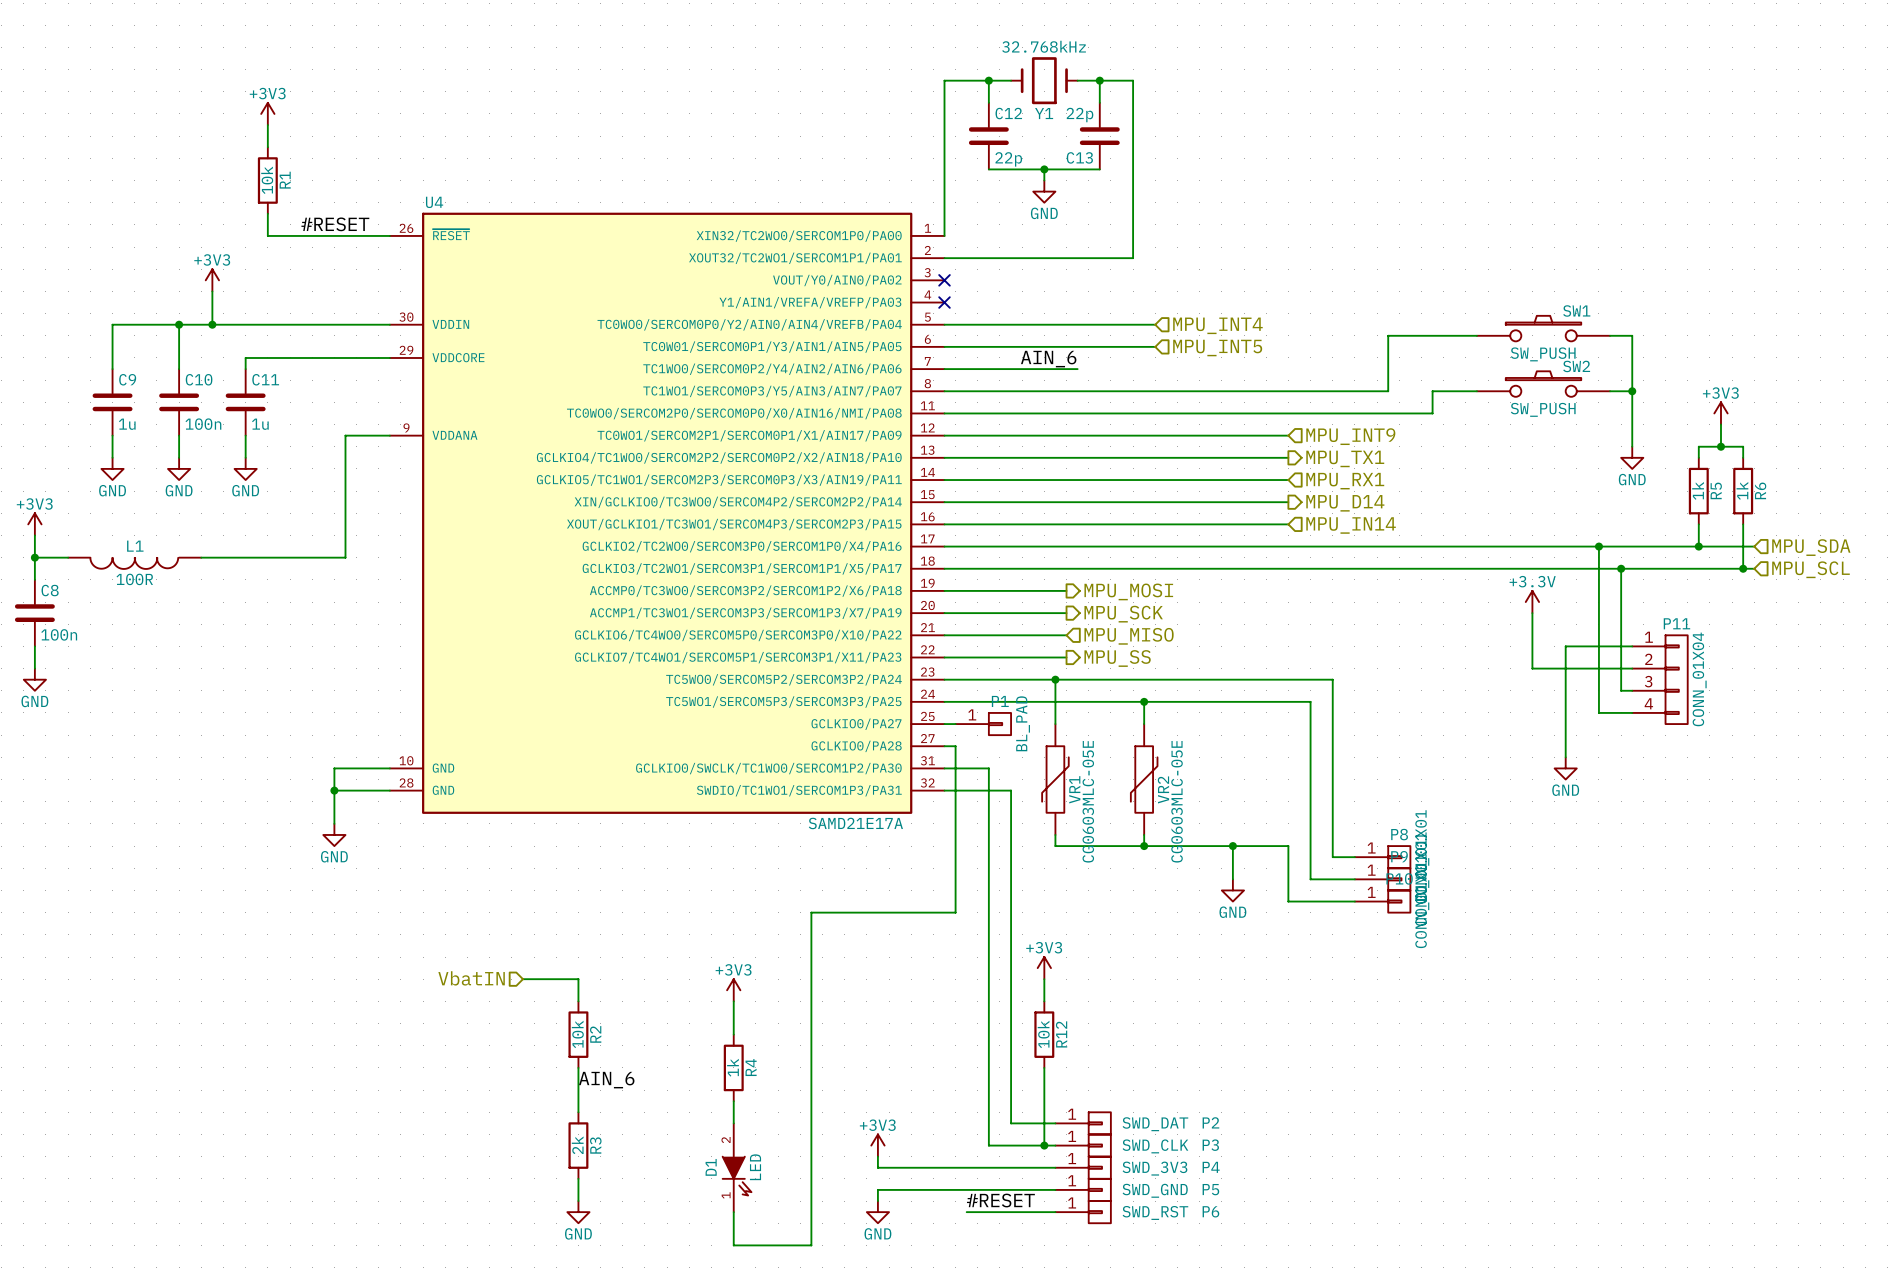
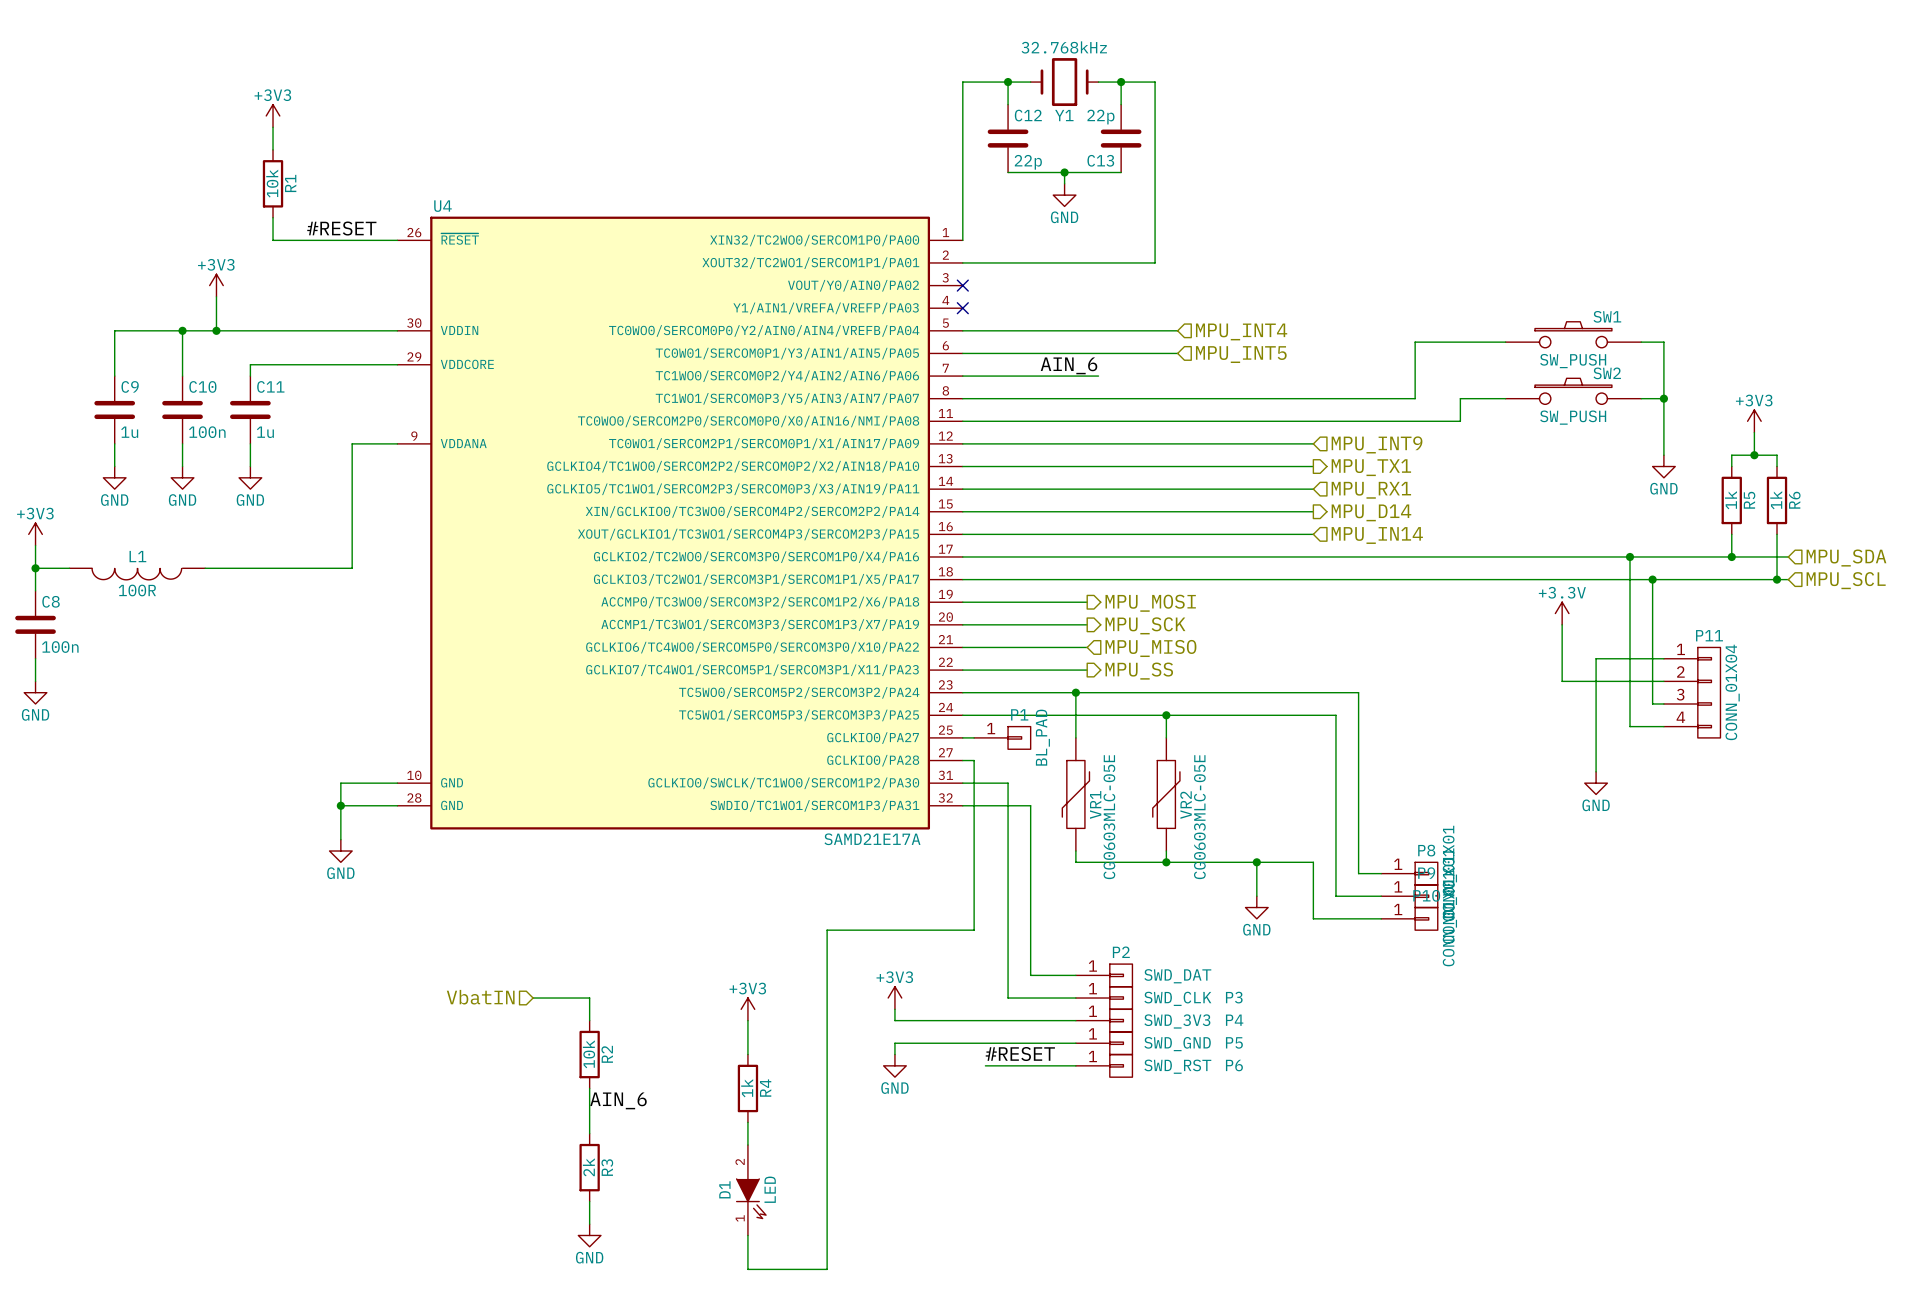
wire: (1011, 957) (1011, 1123) (1055, 1123) -> (1030, 975) (1075, 975)
power symbol: +3V3 (1044, 968) -> none
power symbol: none -> +3V3 (894, 998)
wire: (988, 979) (988, 1145) (1055, 1145) -> (1008, 998) (1075, 998)
wire: (1044, 979) (1044, 1001) -> none
R12: 10k (1044, 1034) -> none
wire: (1044, 1067) (1044, 1145) -> none
P2 name position: P2 (1210, 1122) -> P2 (1121, 952)
P2 position: (1083, 1123) -> (1104, 975)
power symbol: +3V3 (877, 1145) -> none
junction: (1044, 1145) -> none
P3 position: (1083, 1145) -> (1104, 998)
wire: (877, 1156) (877, 1167) (1055, 1167) -> (894, 1009) (894, 1020) (1075, 1020)
P4 position: (1083, 1167) -> (1104, 1020)
wire: (1055, 1189) (877, 1189) (877, 1201) -> (1075, 1043) (894, 1043) (894, 1054)
P5 position: (1083, 1189) -> (1104, 1043)
label position: #RESET (1000, 1200) -> #RESET (1020, 1054)
power symbol position: GND (877, 1212) -> GND (894, 1065)
wire: (966, 1212) (1055, 1212) -> (985, 1065) (1075, 1065)
P6 position: (1083, 1212) -> (1104, 1065)

